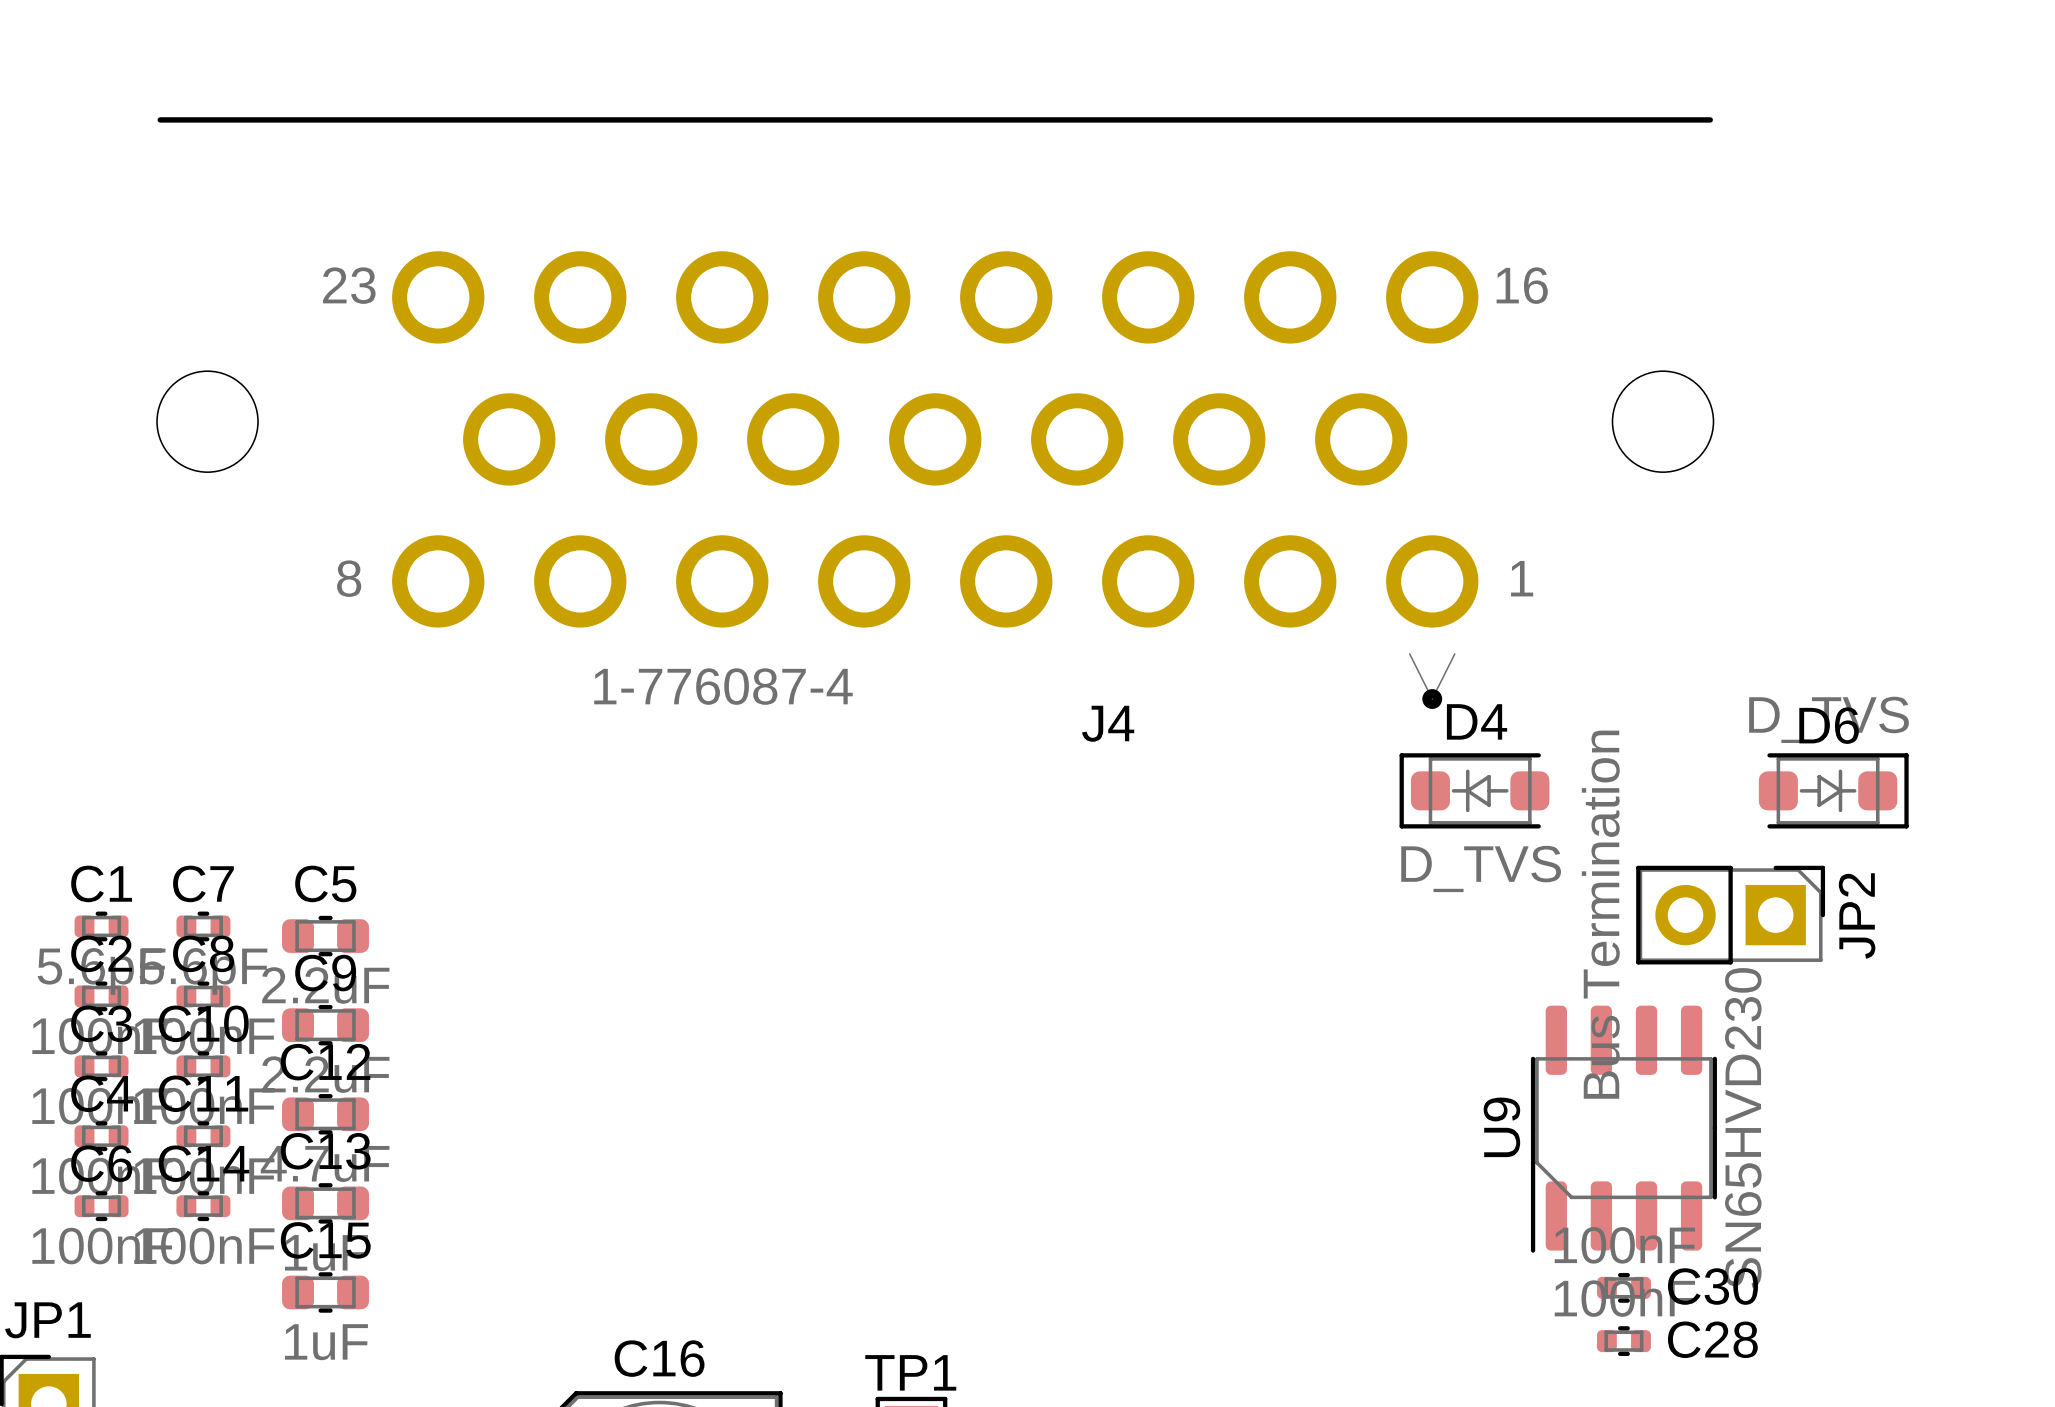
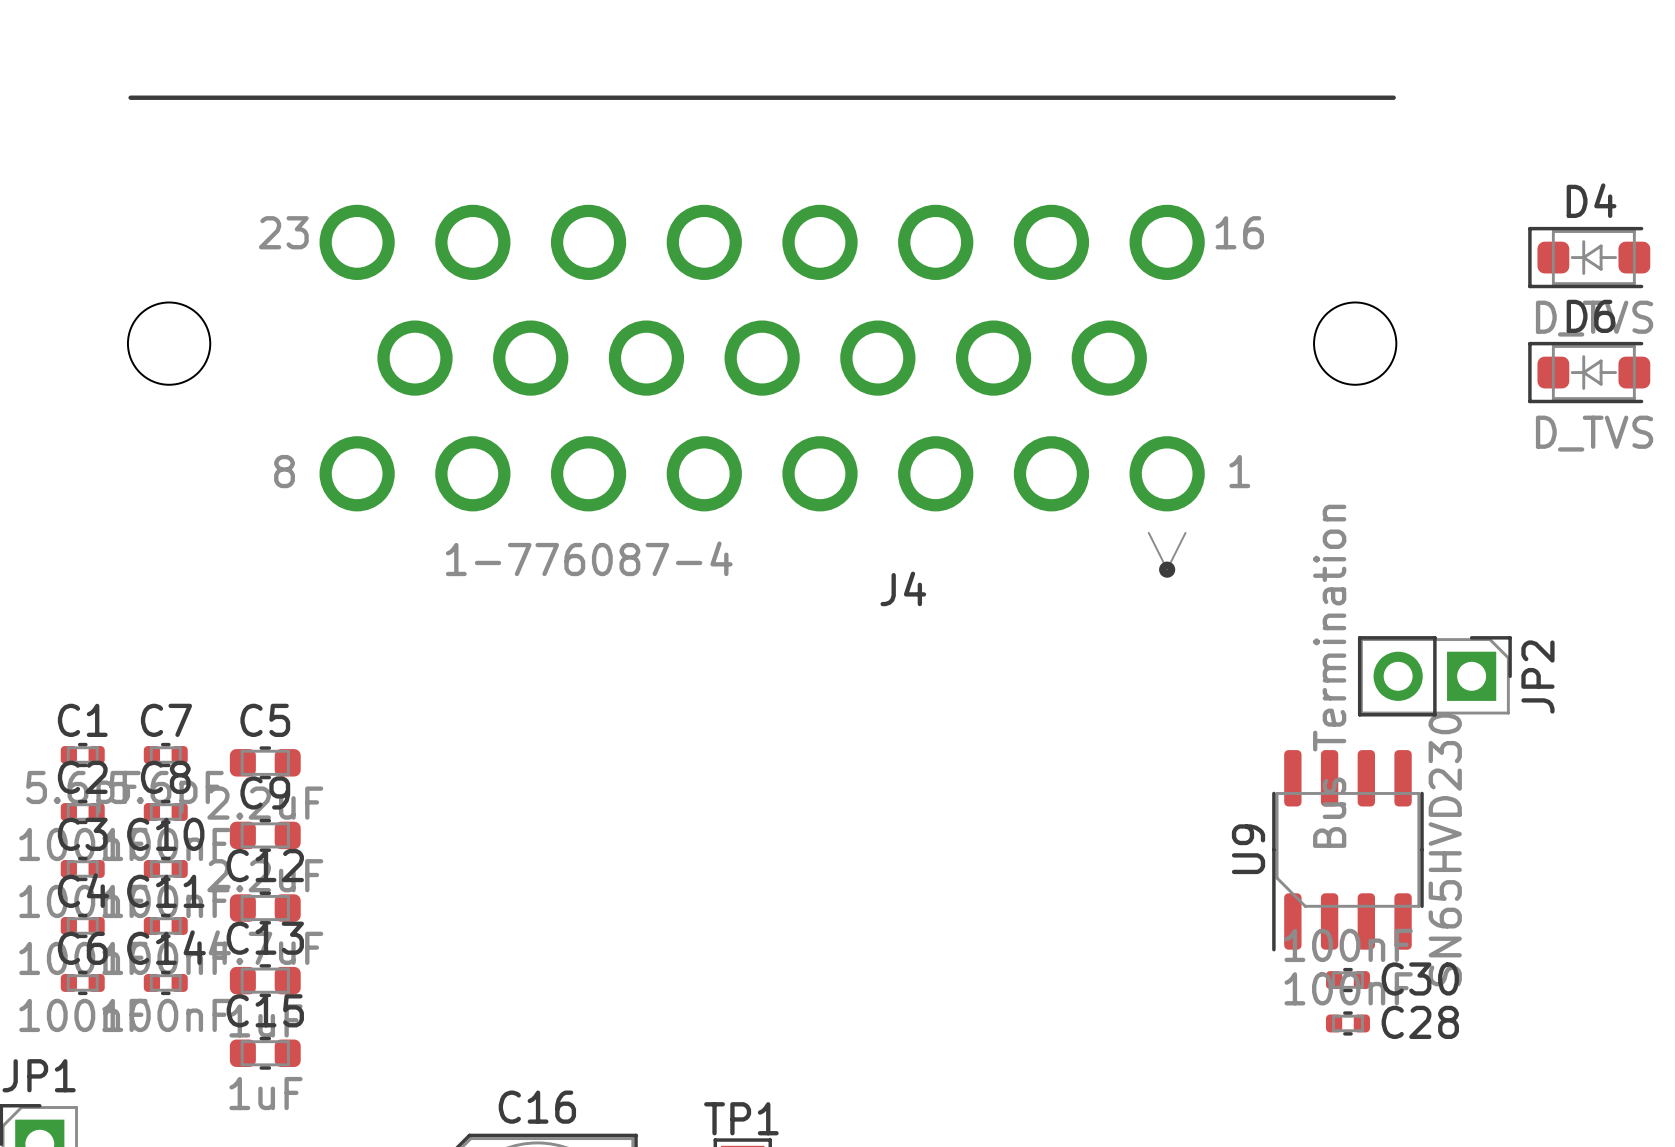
D4 position: (1474, 790) -> (1589, 257)
D6 rotation: 0° (1833, 790) -> 180° (1589, 372)
D6 position: (1833, 790) -> (1589, 372)
JP2 position: (1730, 915) -> (1434, 676)
U9 position: (1623, 1129) -> (1347, 850)
C30 position: (1623, 1287) -> (1347, 980)
C28 position: (1623, 1341) -> (1347, 1023)

